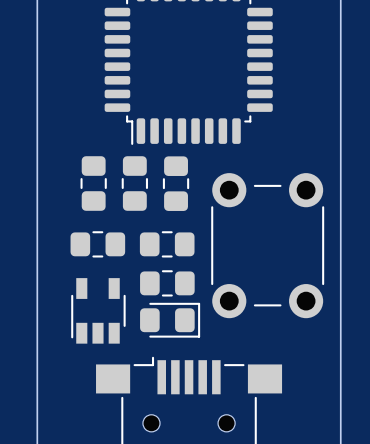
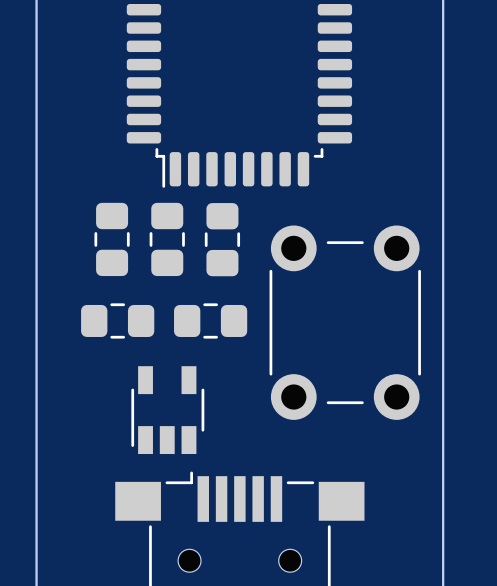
part: (167, 283) -> none
part position: (98, 310) -> (167, 410)
part: (170, 320) -> none

